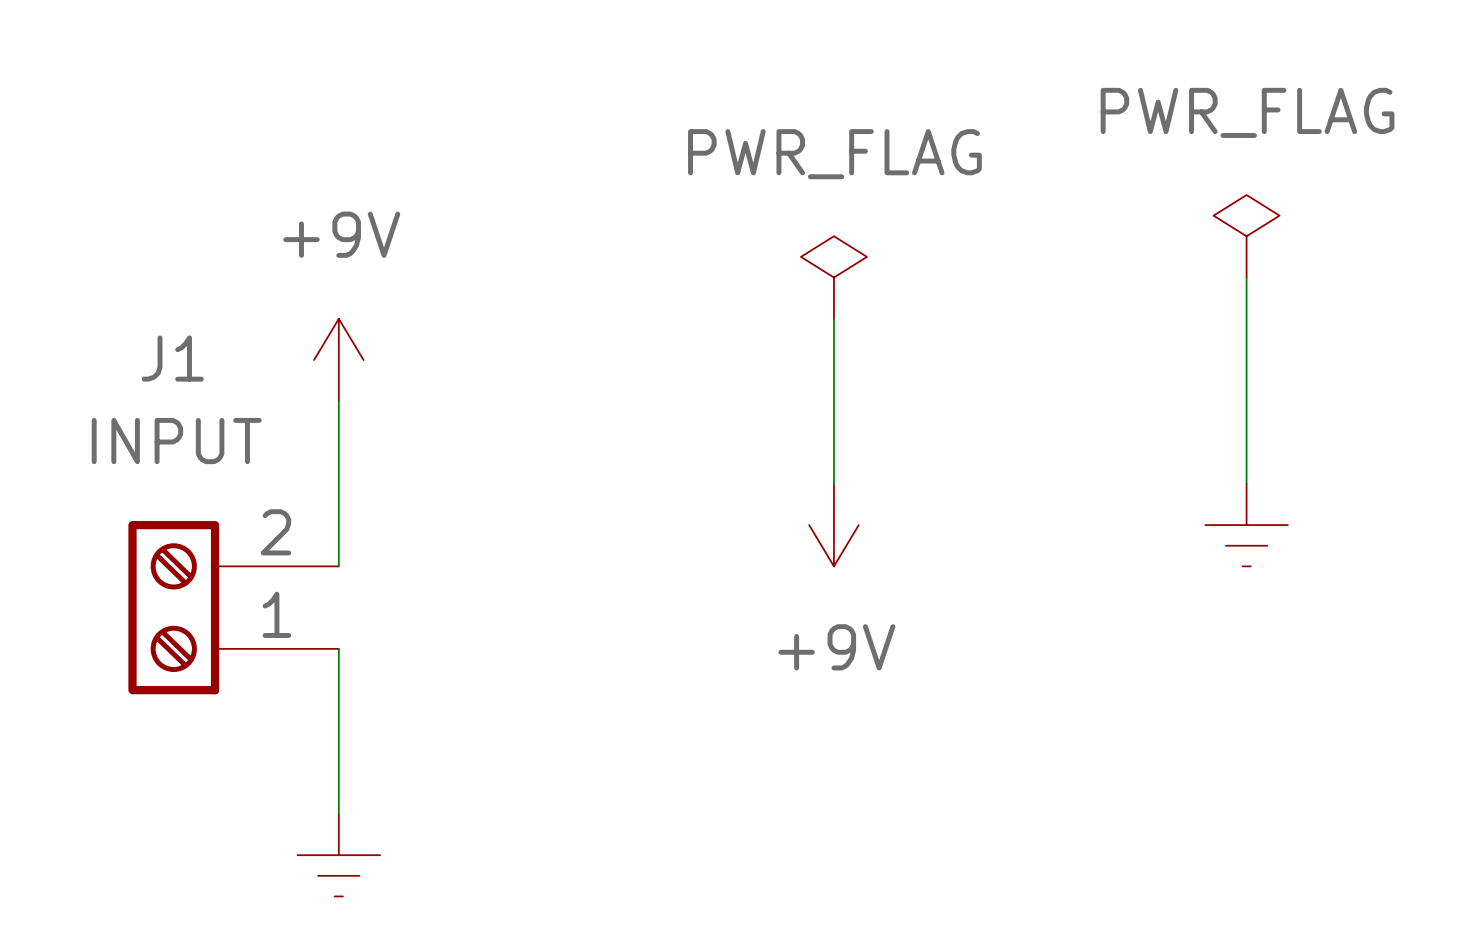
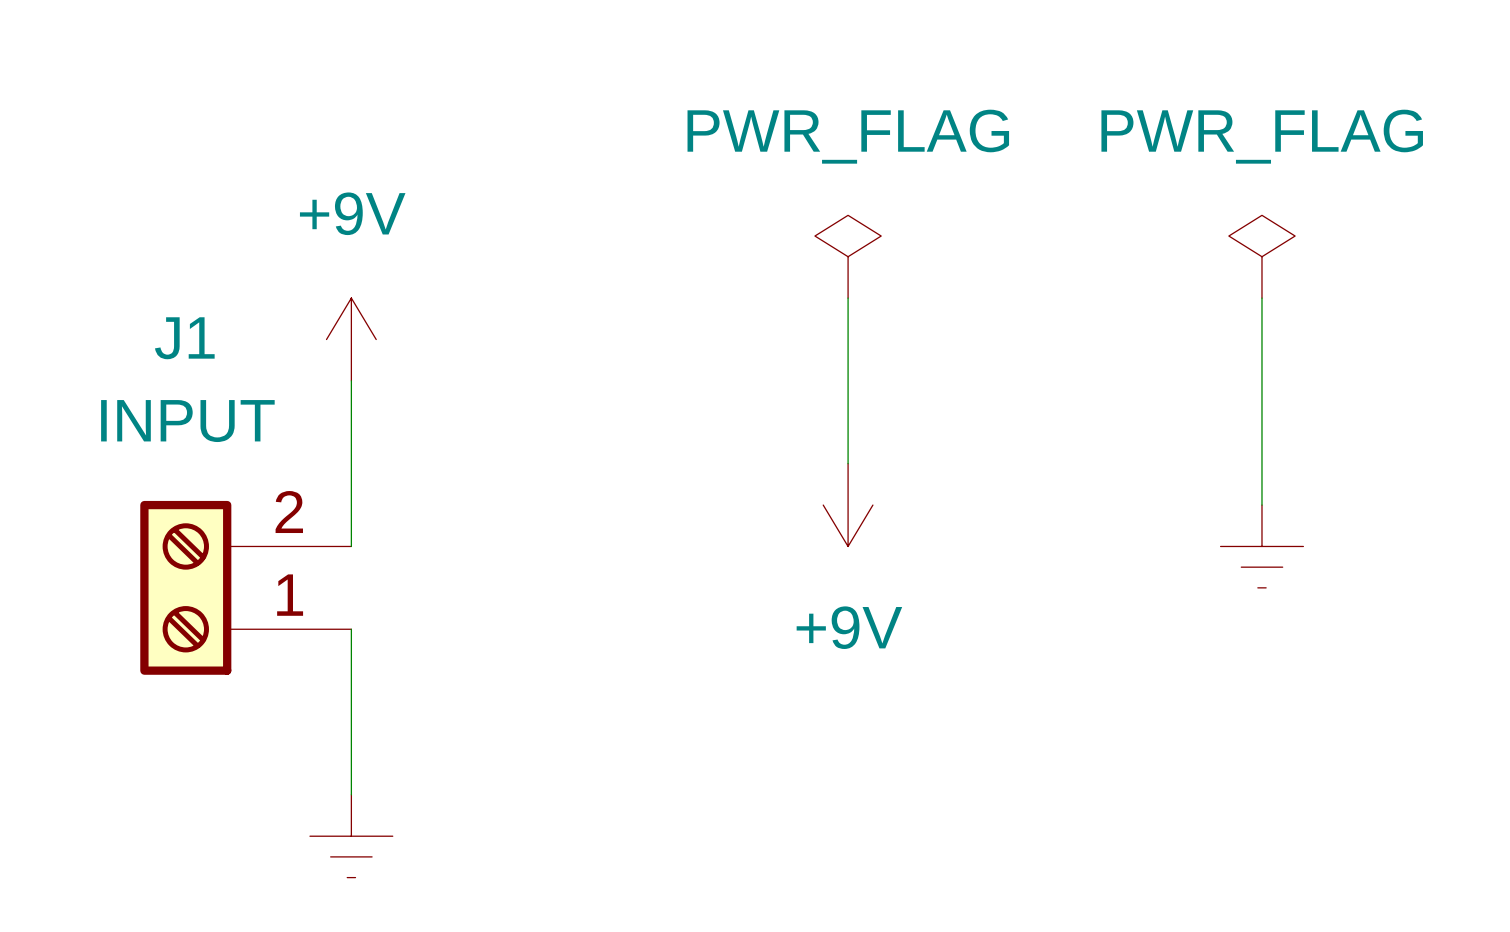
power symbol position: PWR_FLAG (1246, 236) -> PWR_FLAG (1261, 256)
power symbol position: (1246, 525) -> (1261, 546)

